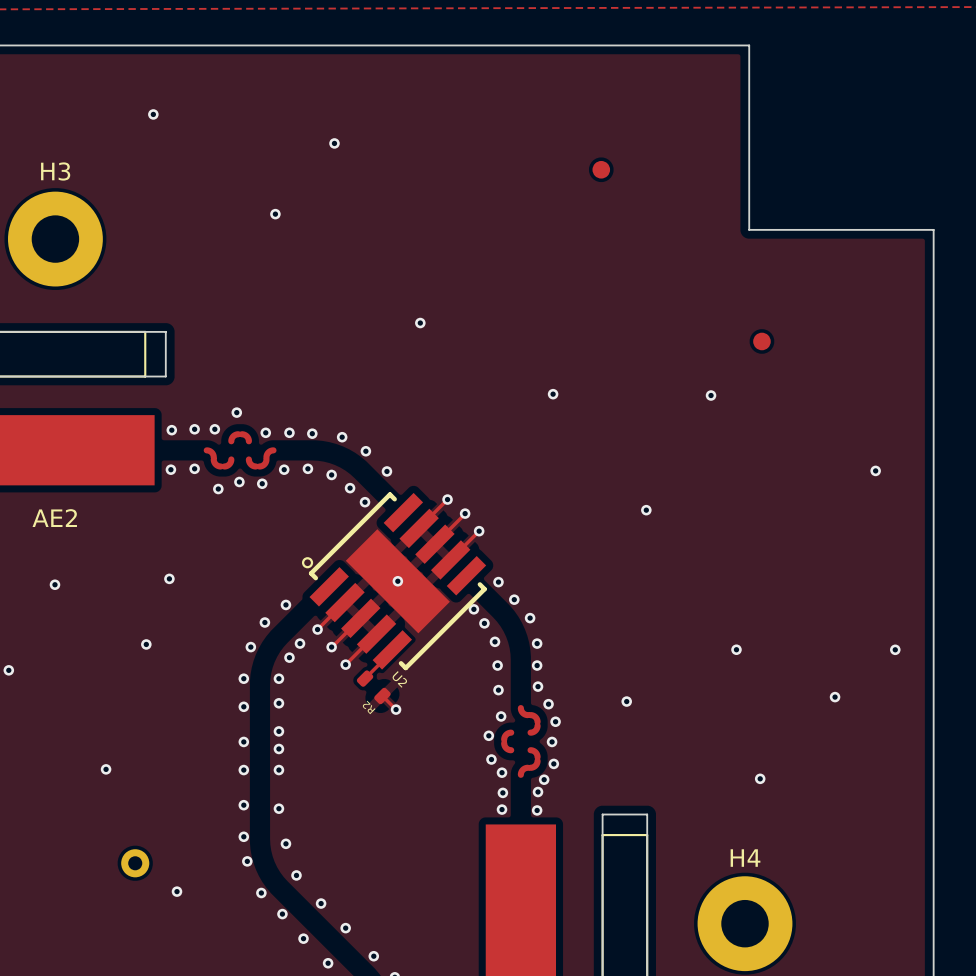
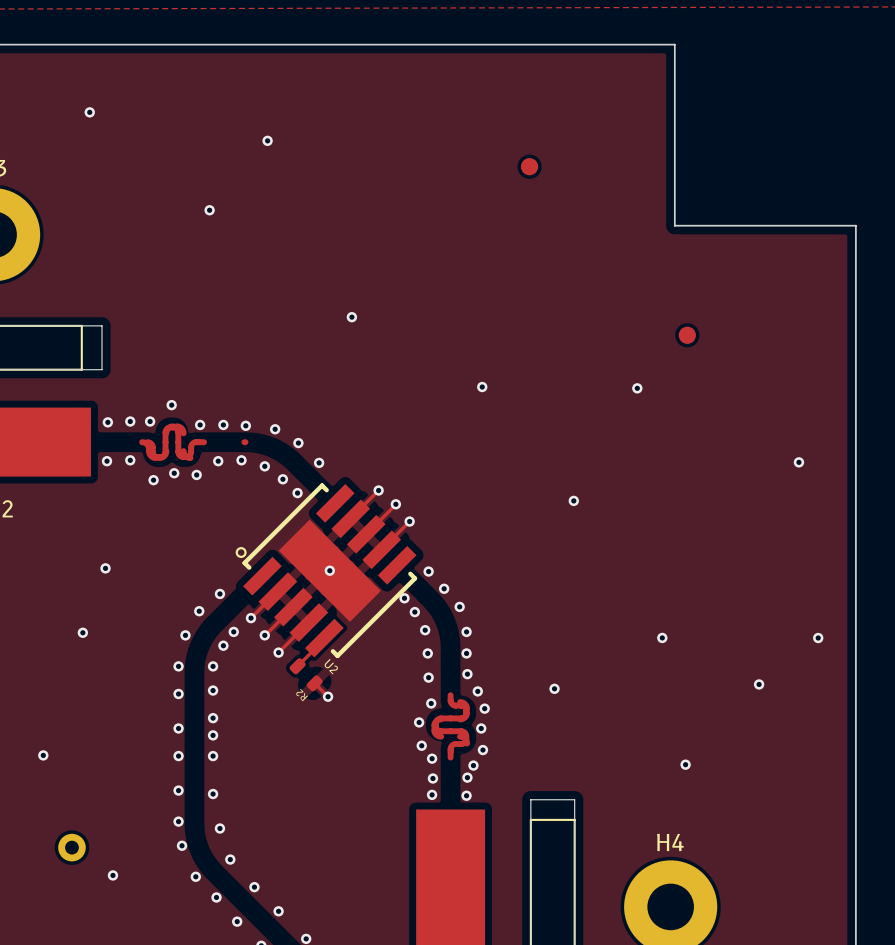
track: none -> (147, 442) (152, 444) (154, 455) (162, 456) (165, 452) (165, 431) (170, 427) (177, 430) (178, 452) (181, 456) (189, 455) (193, 442) (204, 442)
track: (273, 450) (268, 452) (266, 457) -> none
track: none -> (244, 442) (245, 442)
track: (266, 459) (264, 464) (259, 466) -> none
track: (520, 708) (522, 713) (527, 715) -> (450, 695) (452, 704) (463, 706) (466, 710) (463, 718) (440, 718) (435, 722) (436, 728) (438, 730) (461, 731) (465, 734) (464, 742) (451, 746) (450, 757)
track: (537, 760) (535, 765) (530, 767) -> none
track: (527, 767) (522, 769) (520, 774) -> none

